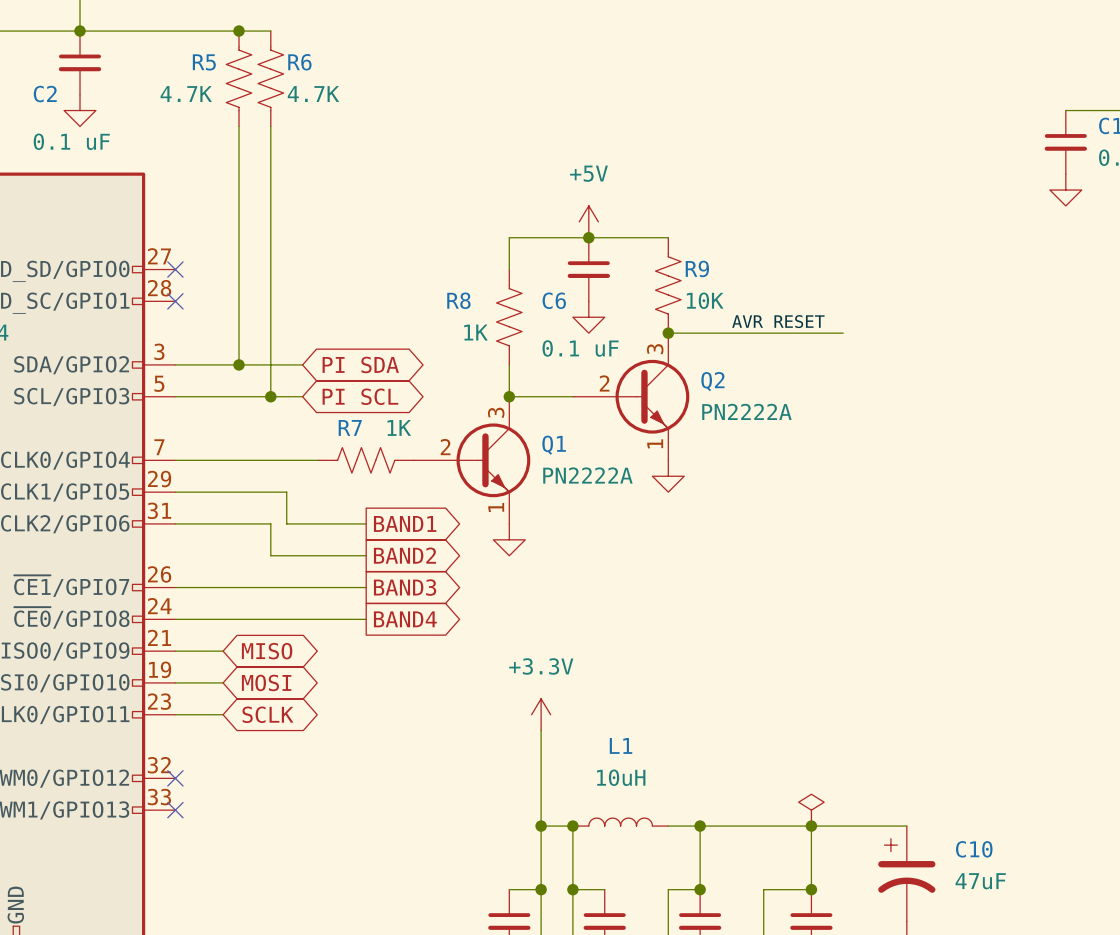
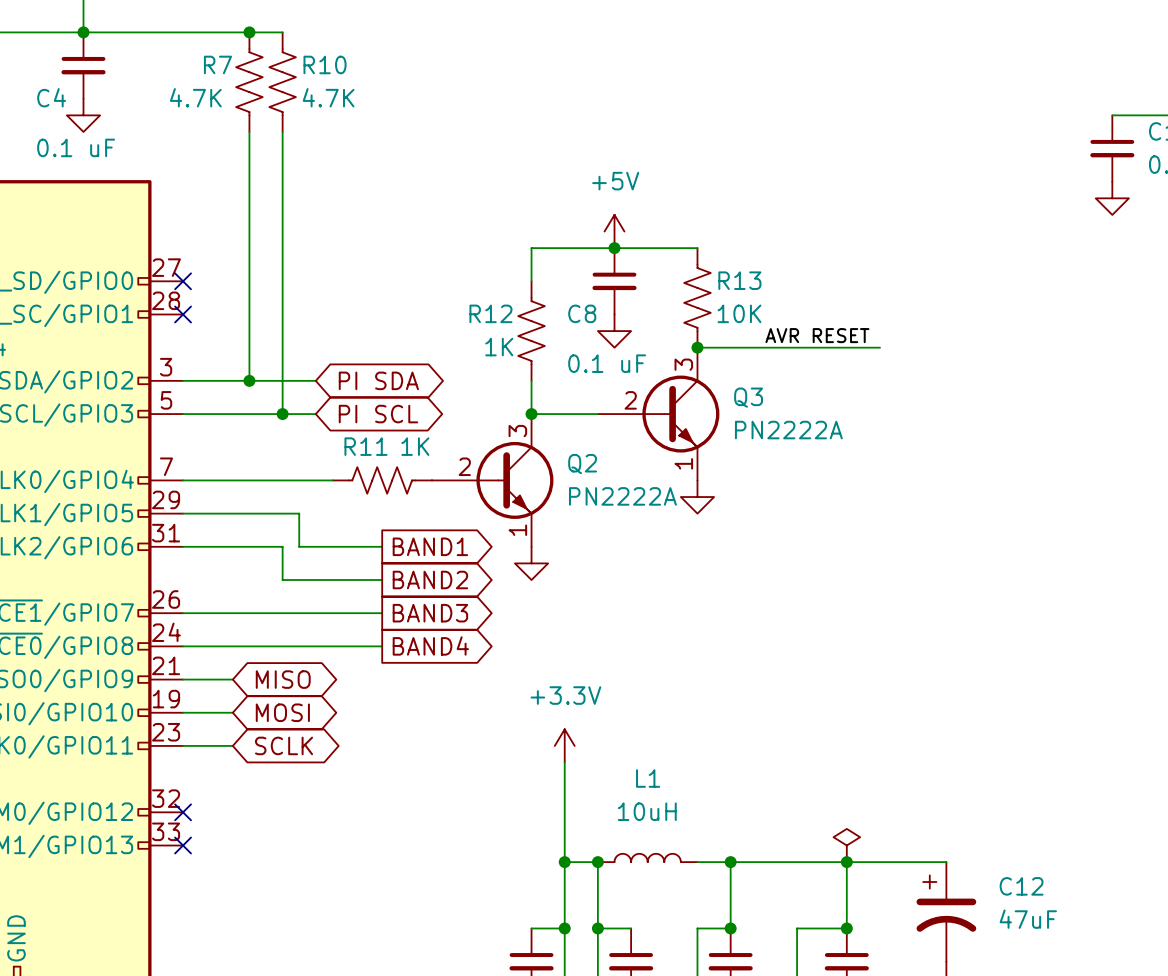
R5 name: R5 (204, 62) -> R7 (217, 64)
R6 name: R6 (299, 62) -> R10 (325, 64)
C2 name: C2 (45, 94) -> C4 (51, 97)
R9 name: R9 (697, 268) -> R13 (739, 280)
R8 name: R8 (458, 300) -> R12 (490, 313)
C6 name: C6 (554, 300) -> C8 (582, 313)
Q2 name: Q2 (712, 381) -> Q3 (748, 397)
R7 name: R7 (350, 427) -> R11 (365, 446)
Q1 name: Q1 (554, 445) -> Q2 (582, 464)
C10 name: C10 (974, 849) -> C12 (1021, 886)

